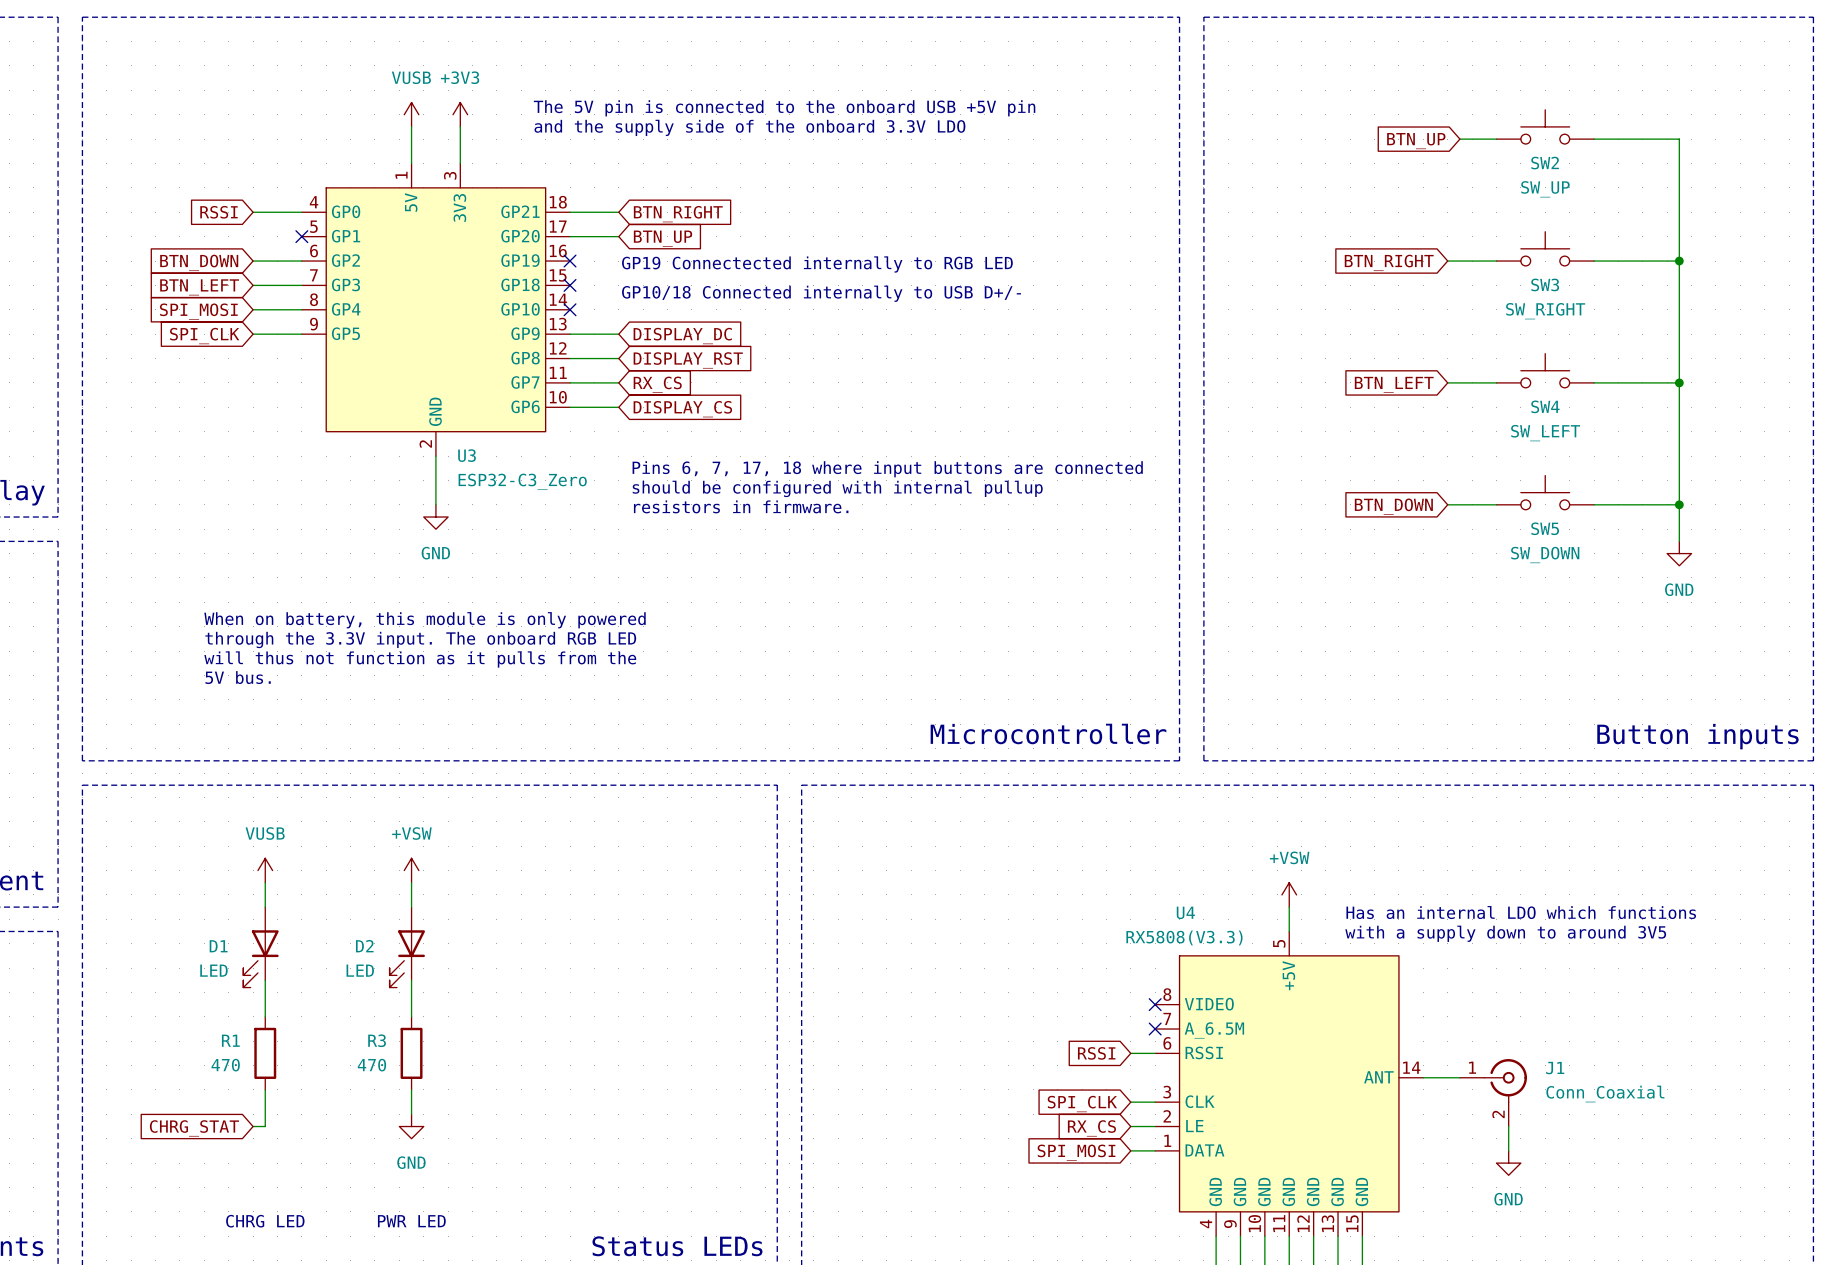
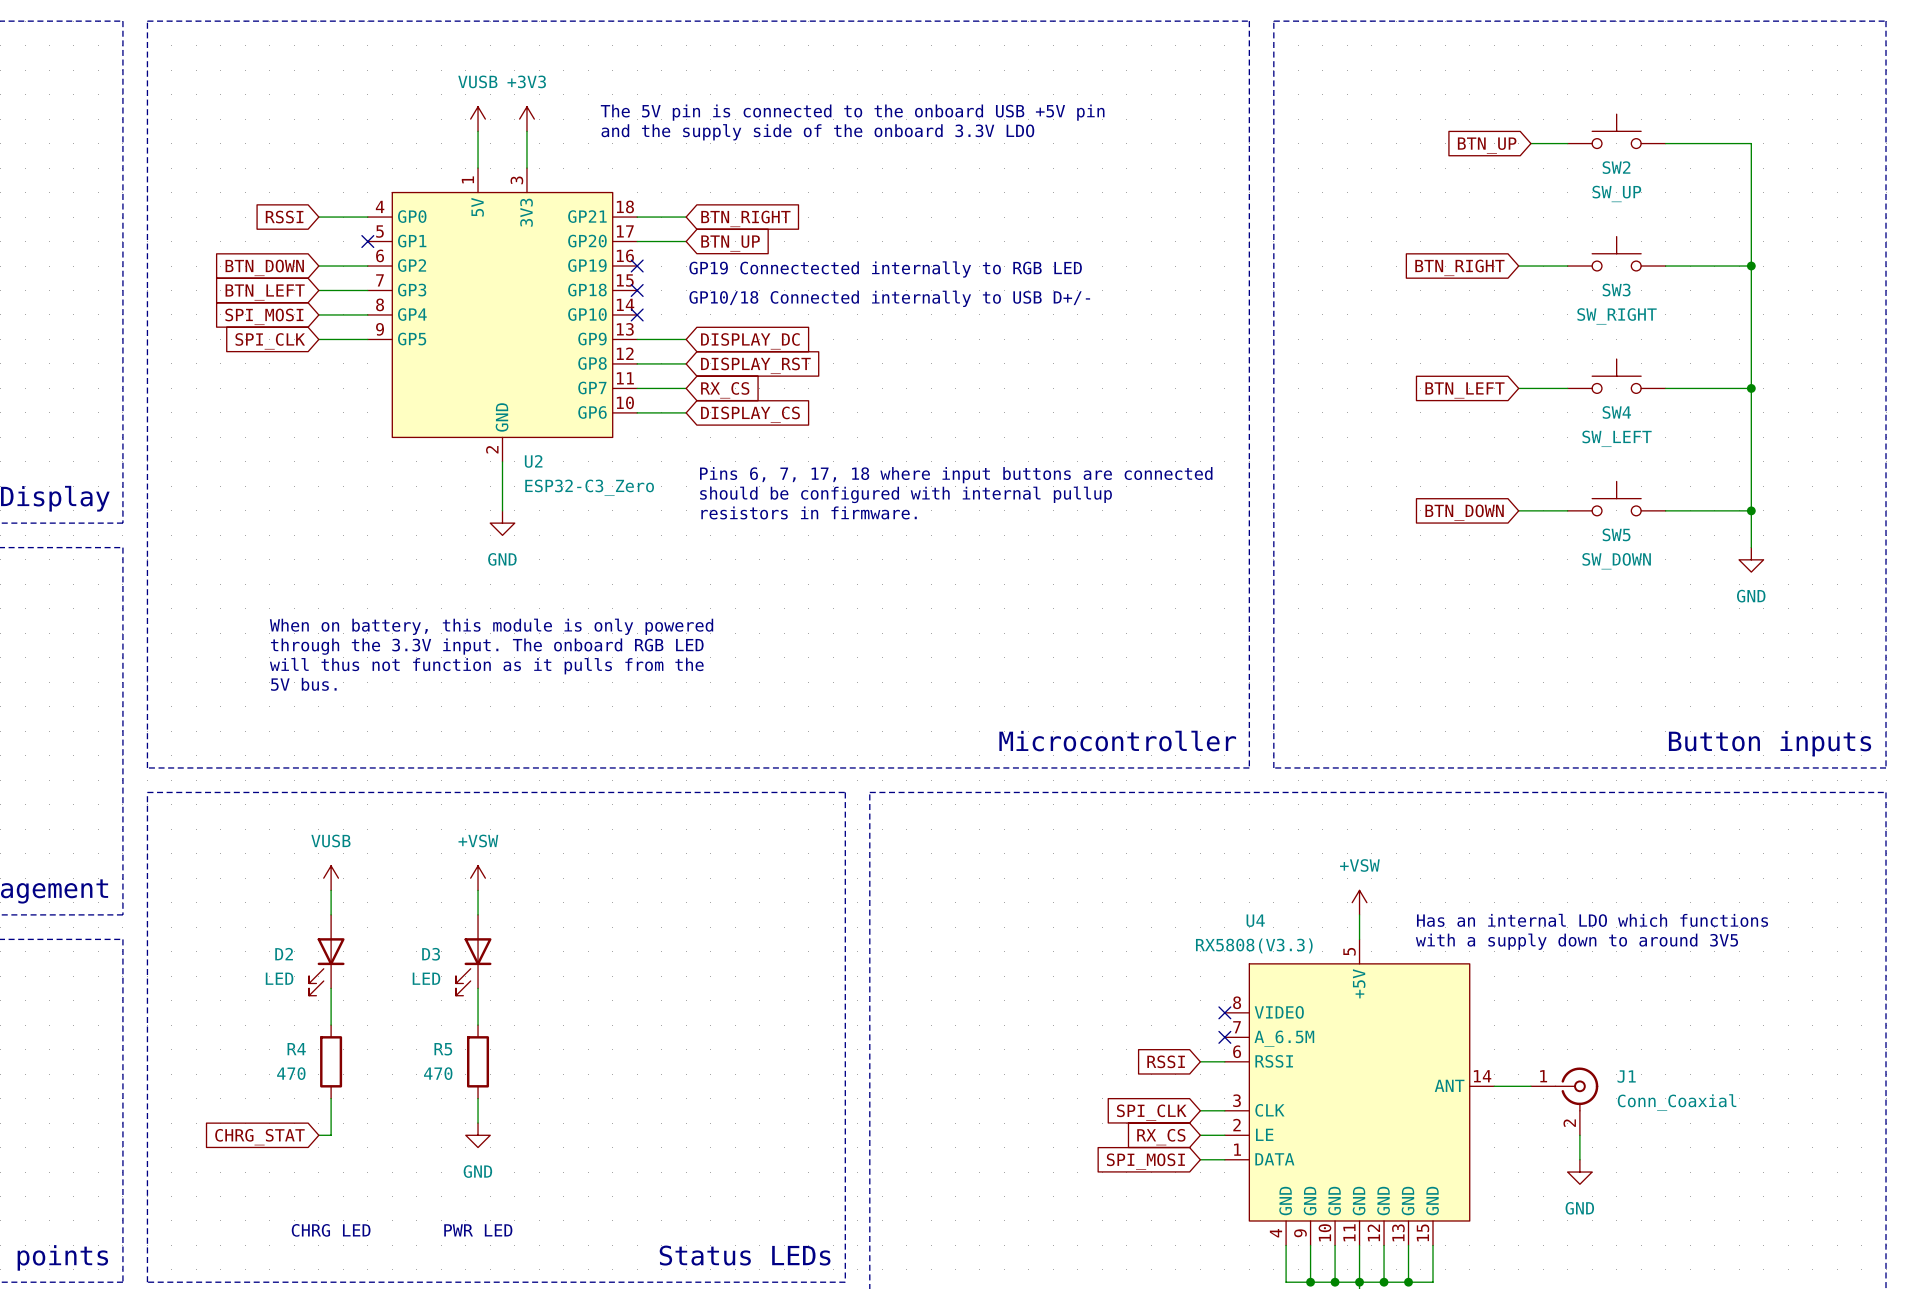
U3 name: U3 (467, 455) -> U2 (533, 461)
D1 name: D1 (218, 946) -> D2 (284, 954)
D2 name: D2 (364, 946) -> D3 (431, 954)
R1 name: R1 (230, 1040) -> R4 (296, 1049)
R3 name: R3 (377, 1040) -> R5 (443, 1049)

